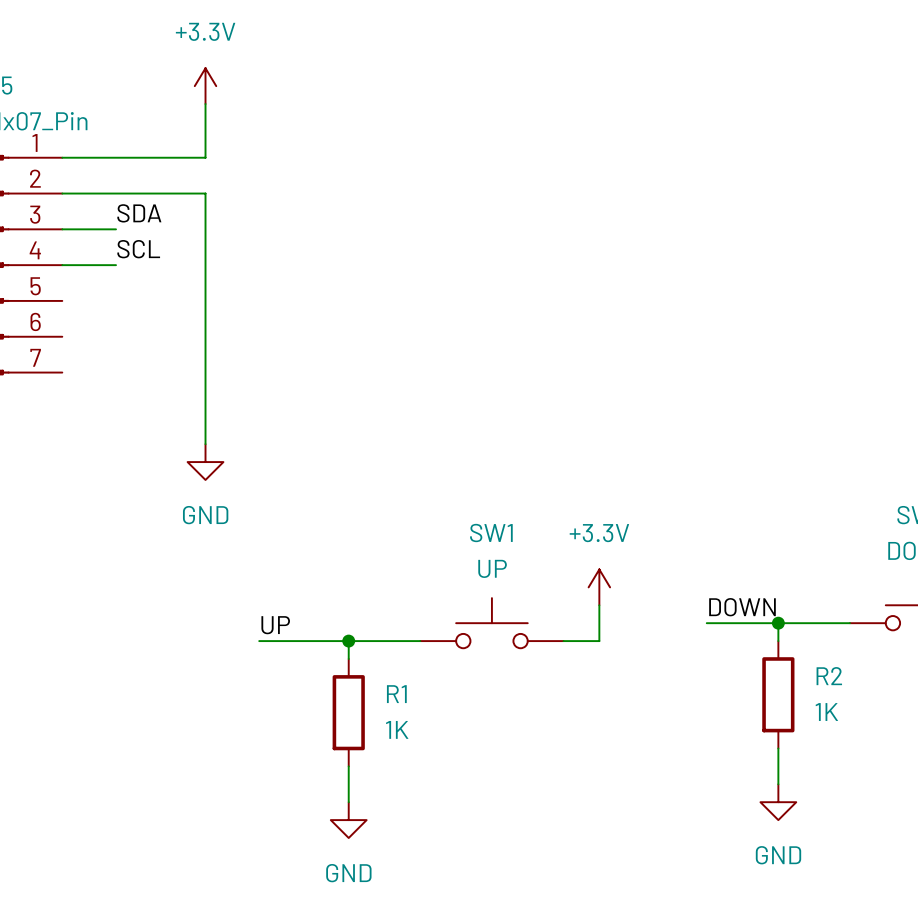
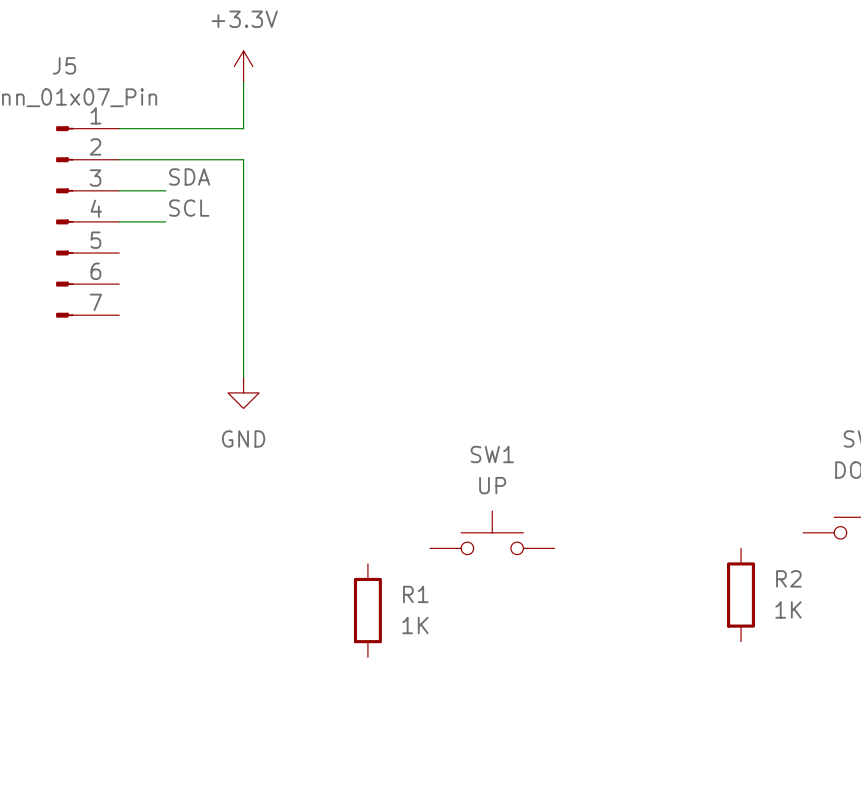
power symbol: +3.3V (599, 587) -> none
wire: (599, 605) (599, 641) (563, 641) -> none
label: DOWN (742, 607) -> none
wire: (706, 623) (849, 623) -> none
wire: (778, 623) (778, 641) -> none
junction: (778, 623) -> none
label: UP (275, 625) -> none
wire: (259, 641) (420, 641) -> none
wire: (348, 641) (348, 658) -> none
junction: (348, 641) -> none
wire: (778, 748) (778, 784) -> none
wire: (348, 766) (348, 802) -> none
power symbol: GND (778, 802) -> none
power symbol: GND (348, 820) -> none

